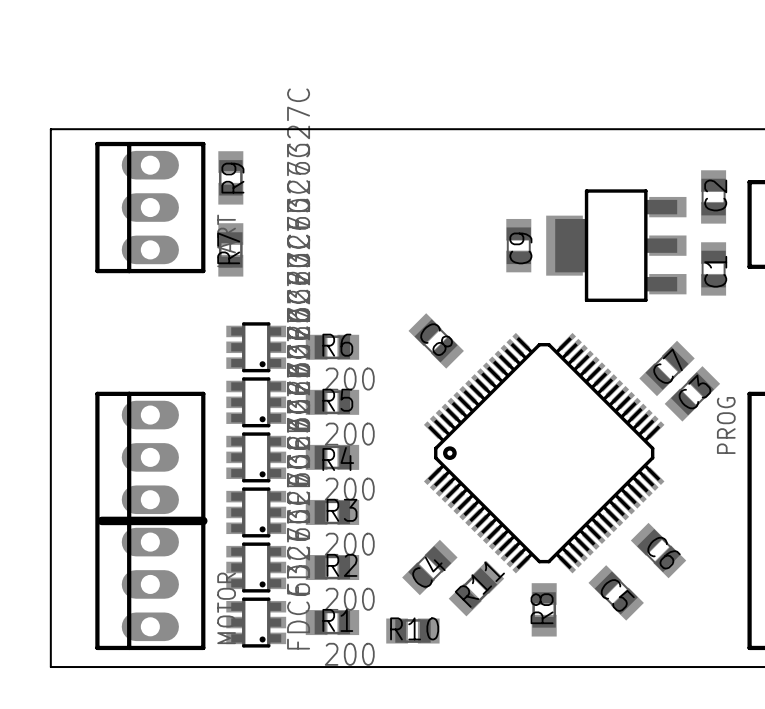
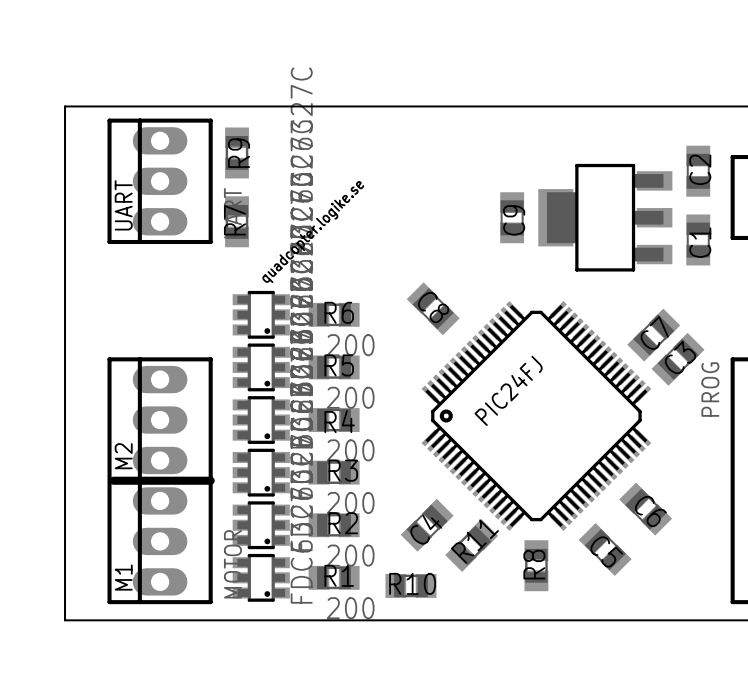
text: none -> UART (123, 205)
text: none -> quadcopter.logike.se (313, 232)
text: none -> PIC24FJ (508, 390)
text: none -> M2 (123, 456)
text: none -> M1 (123, 577)

